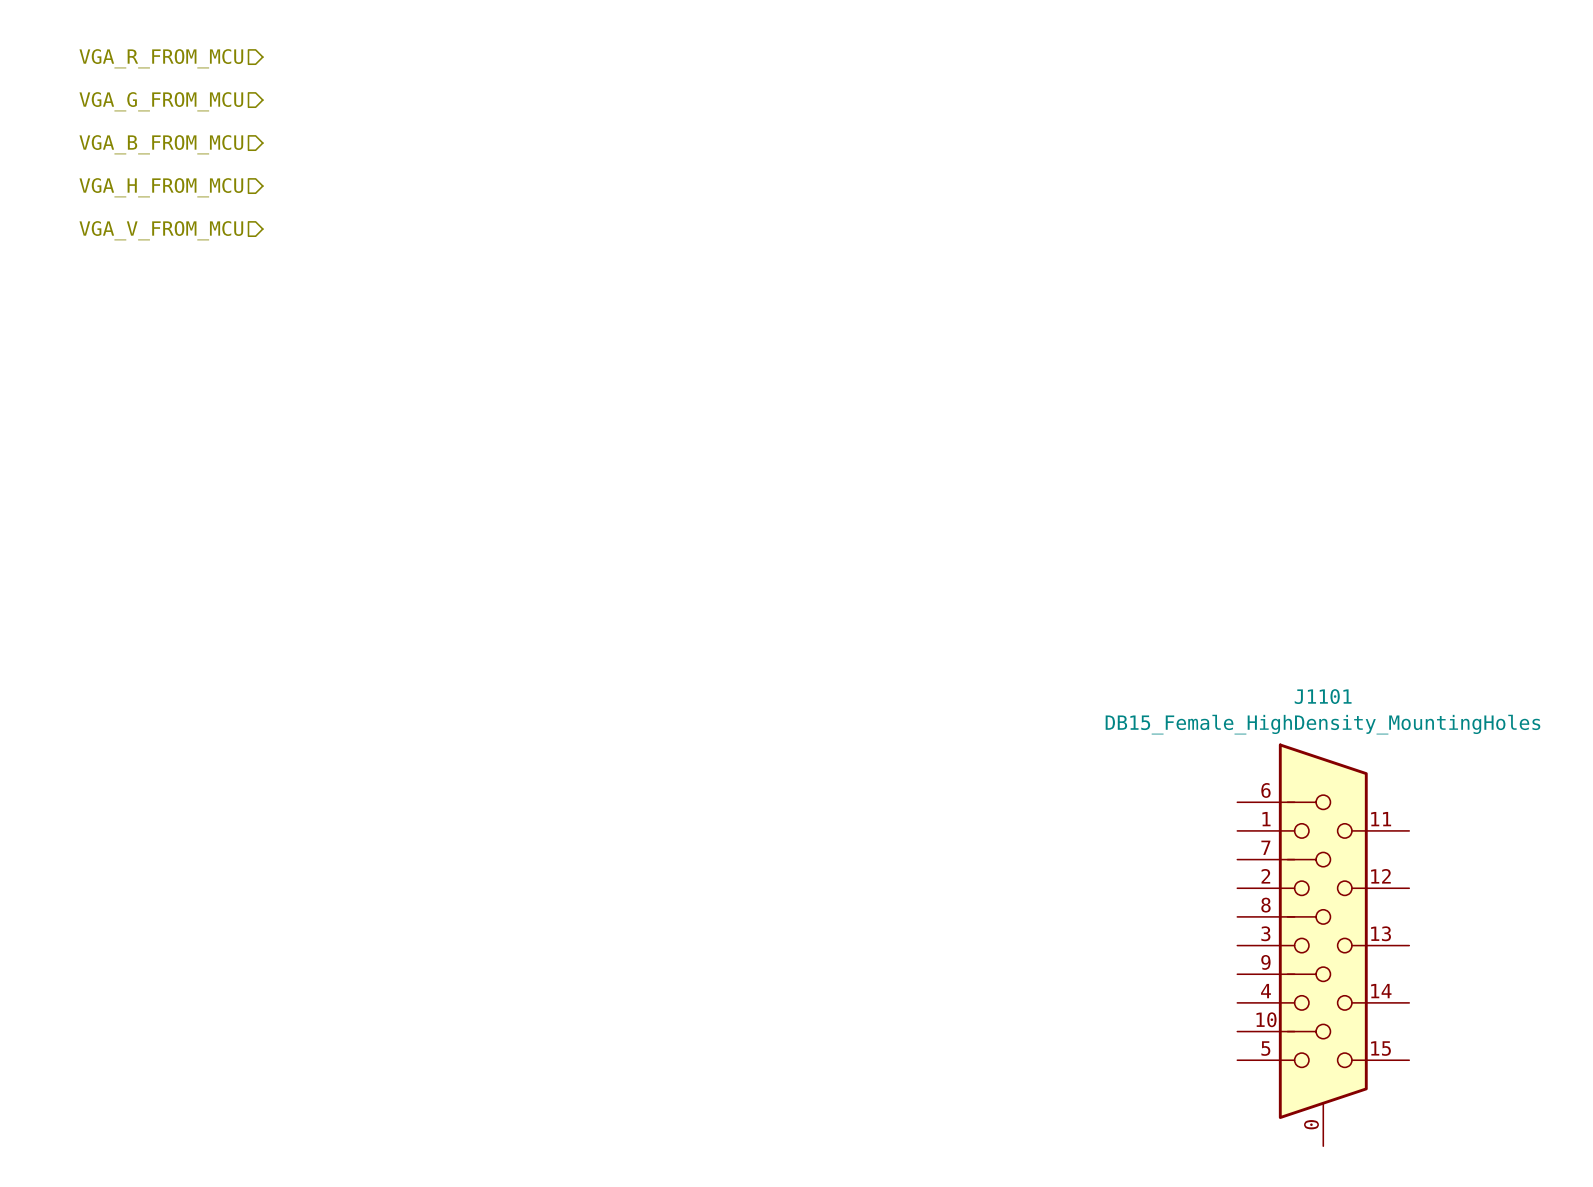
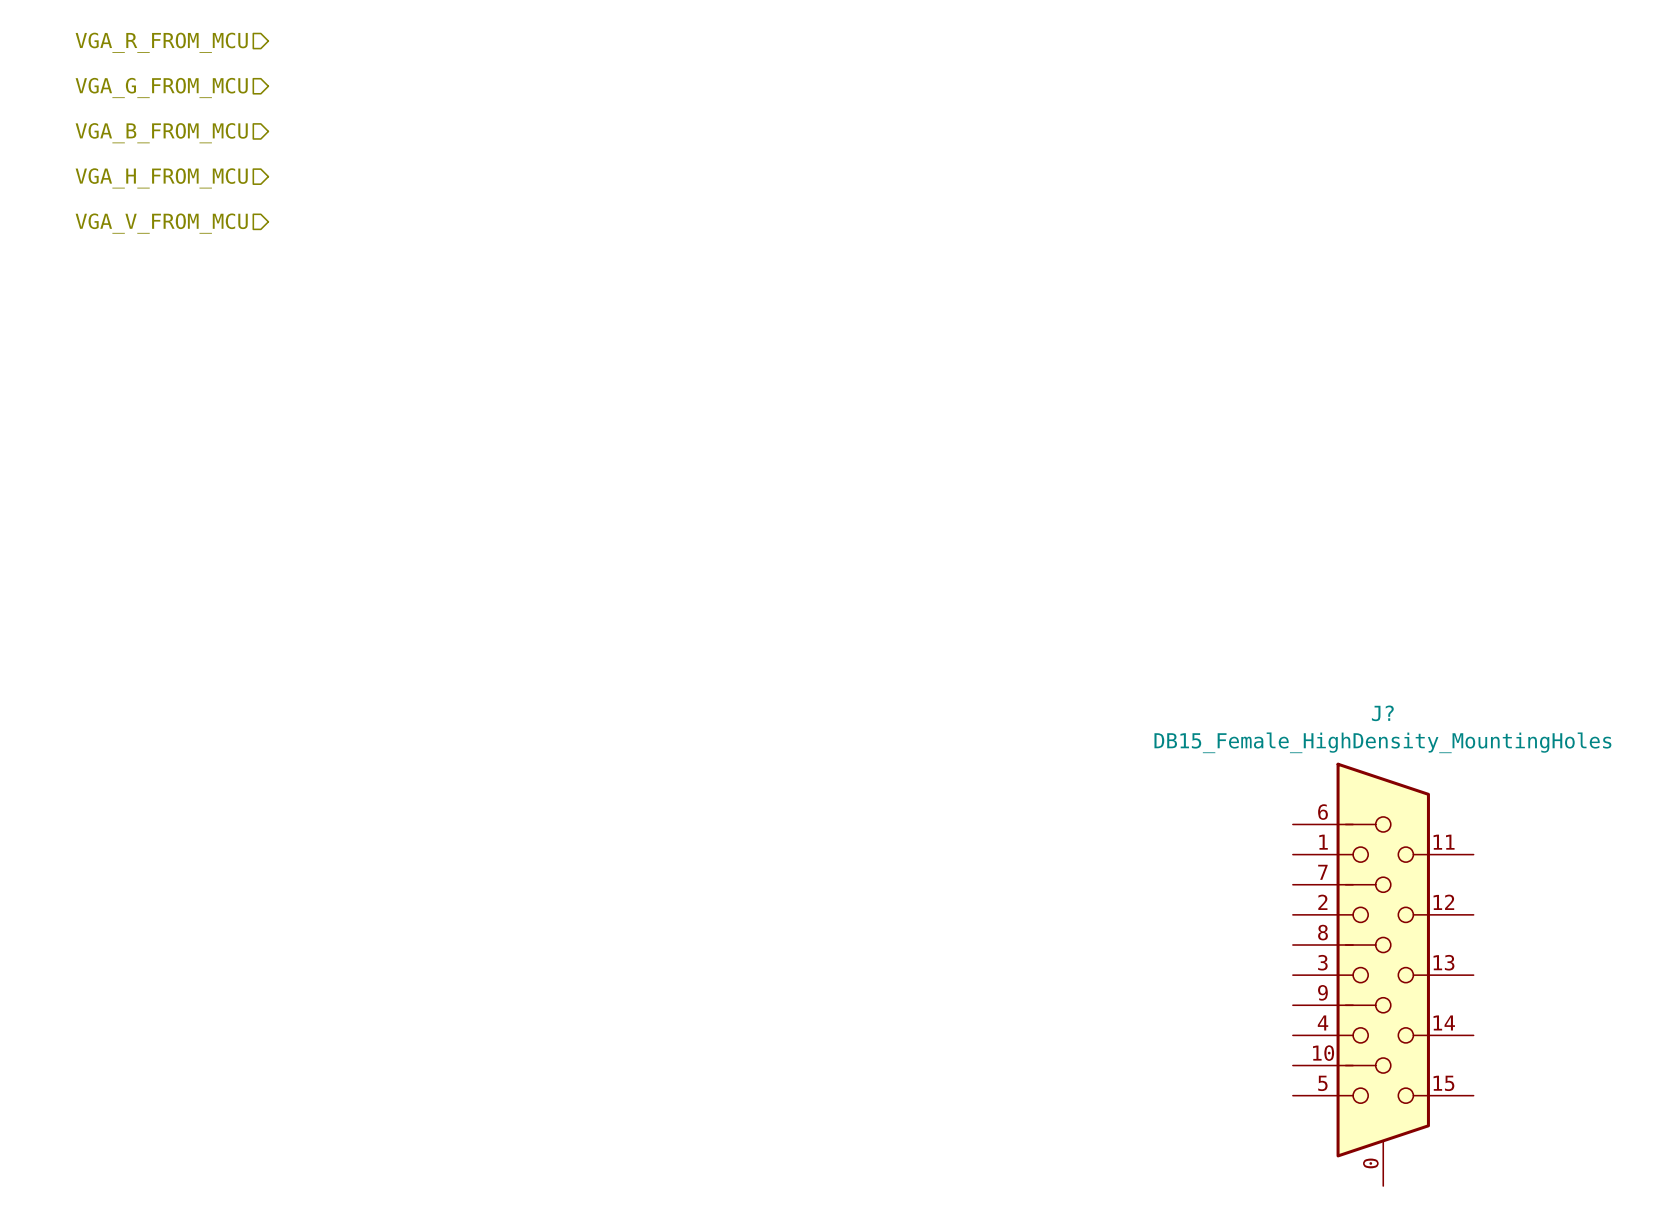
J1101 name: J1101 (1323, 696) -> J? (1382, 713)

